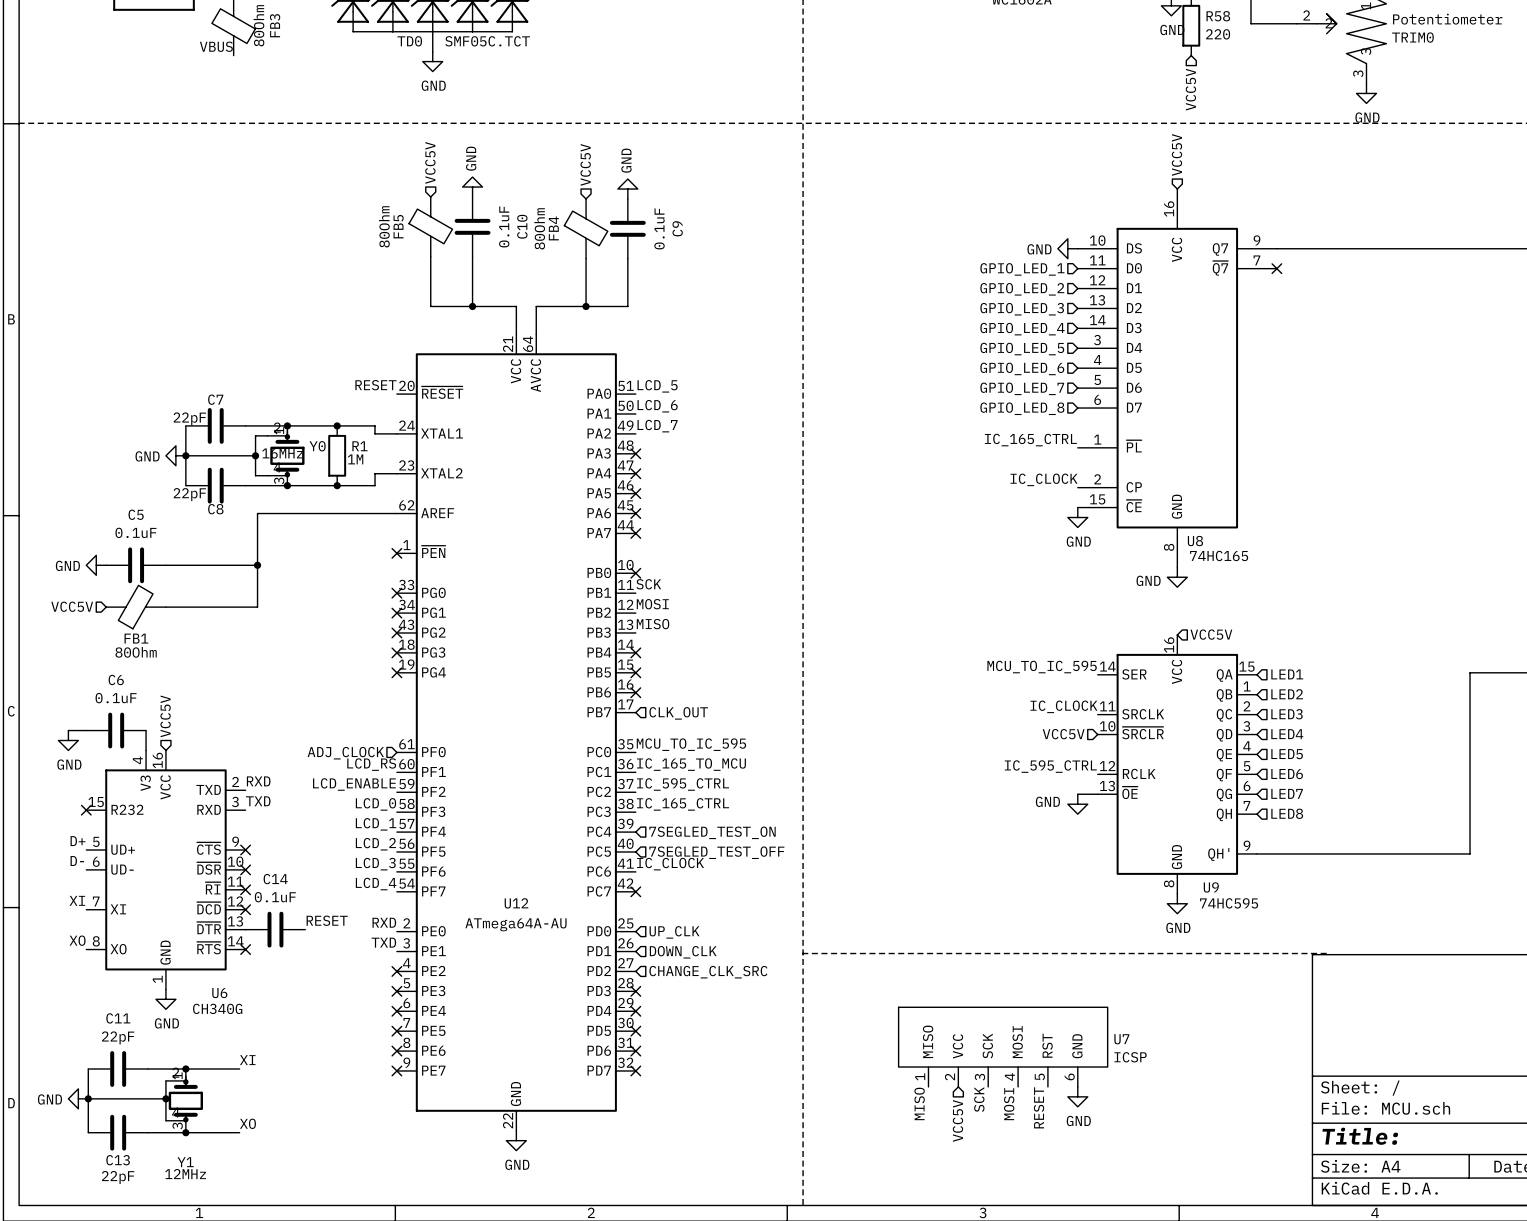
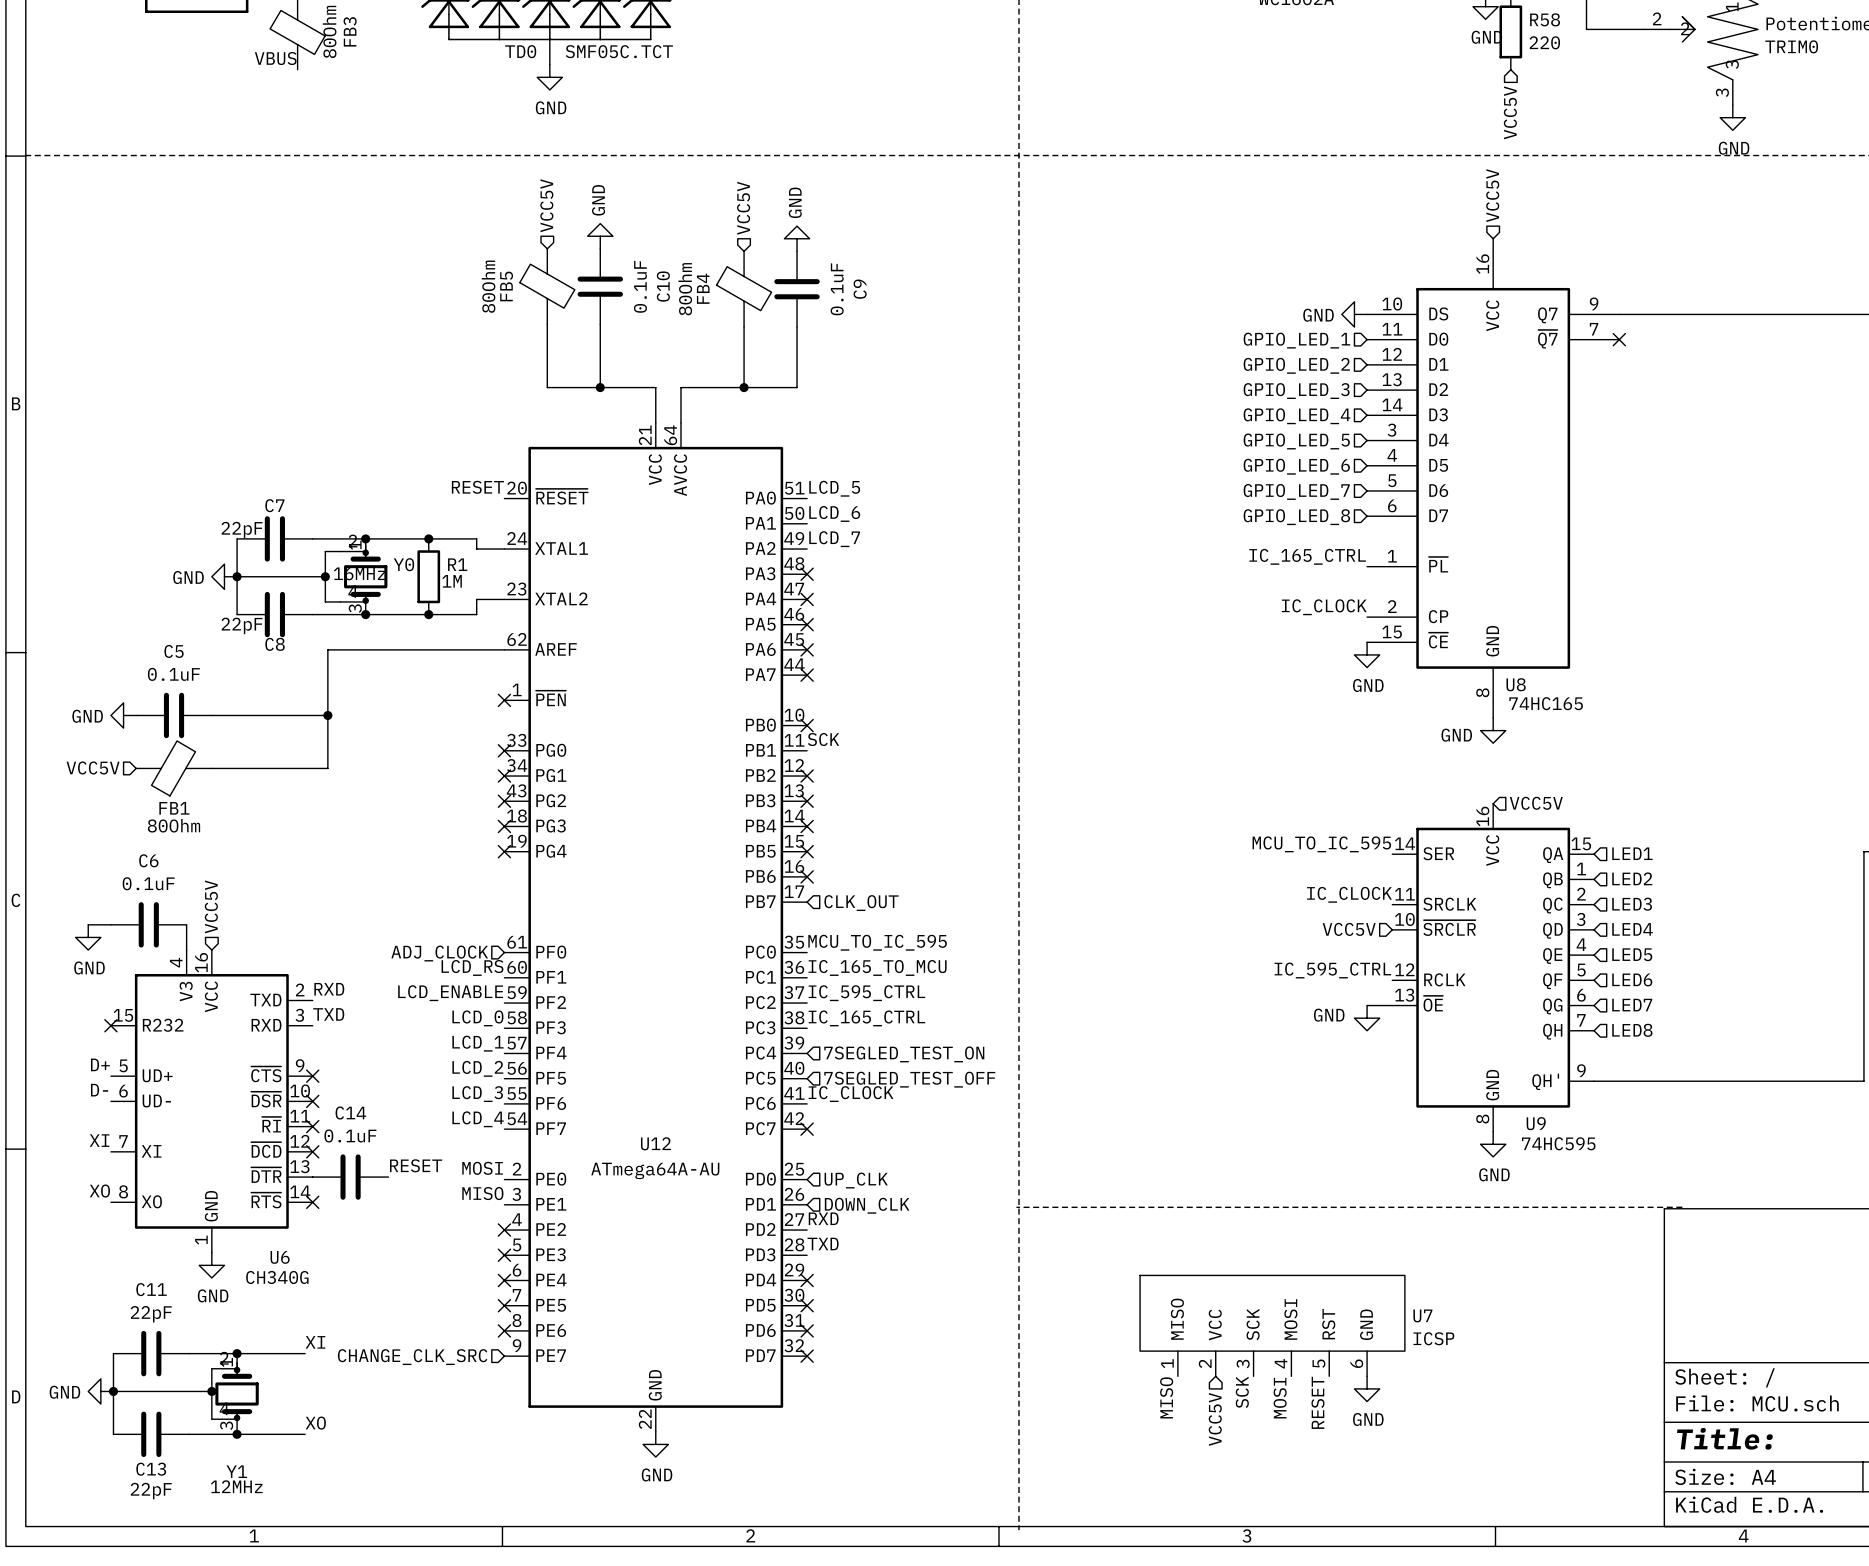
label: MOSI (652, 604) -> none
no-connect mark: none -> (807, 776)
label: MISO (653, 624) -> none
no-connect mark: none -> (807, 801)
label: RXD (384, 922) -> MOSI (482, 1168)
label: TXD (383, 942) -> MISO (482, 1193)
label: none -> RXD (823, 1218)
hierarchical label: CHANGE_CLK_SRC (708, 972) -> none
label: none -> TXD (823, 1244)
no-connect mark: (635, 991) -> none
no-connect mark: (396, 1070) -> none
hierarchical label: none -> CHANGE_CLK_SRC (412, 1357)

